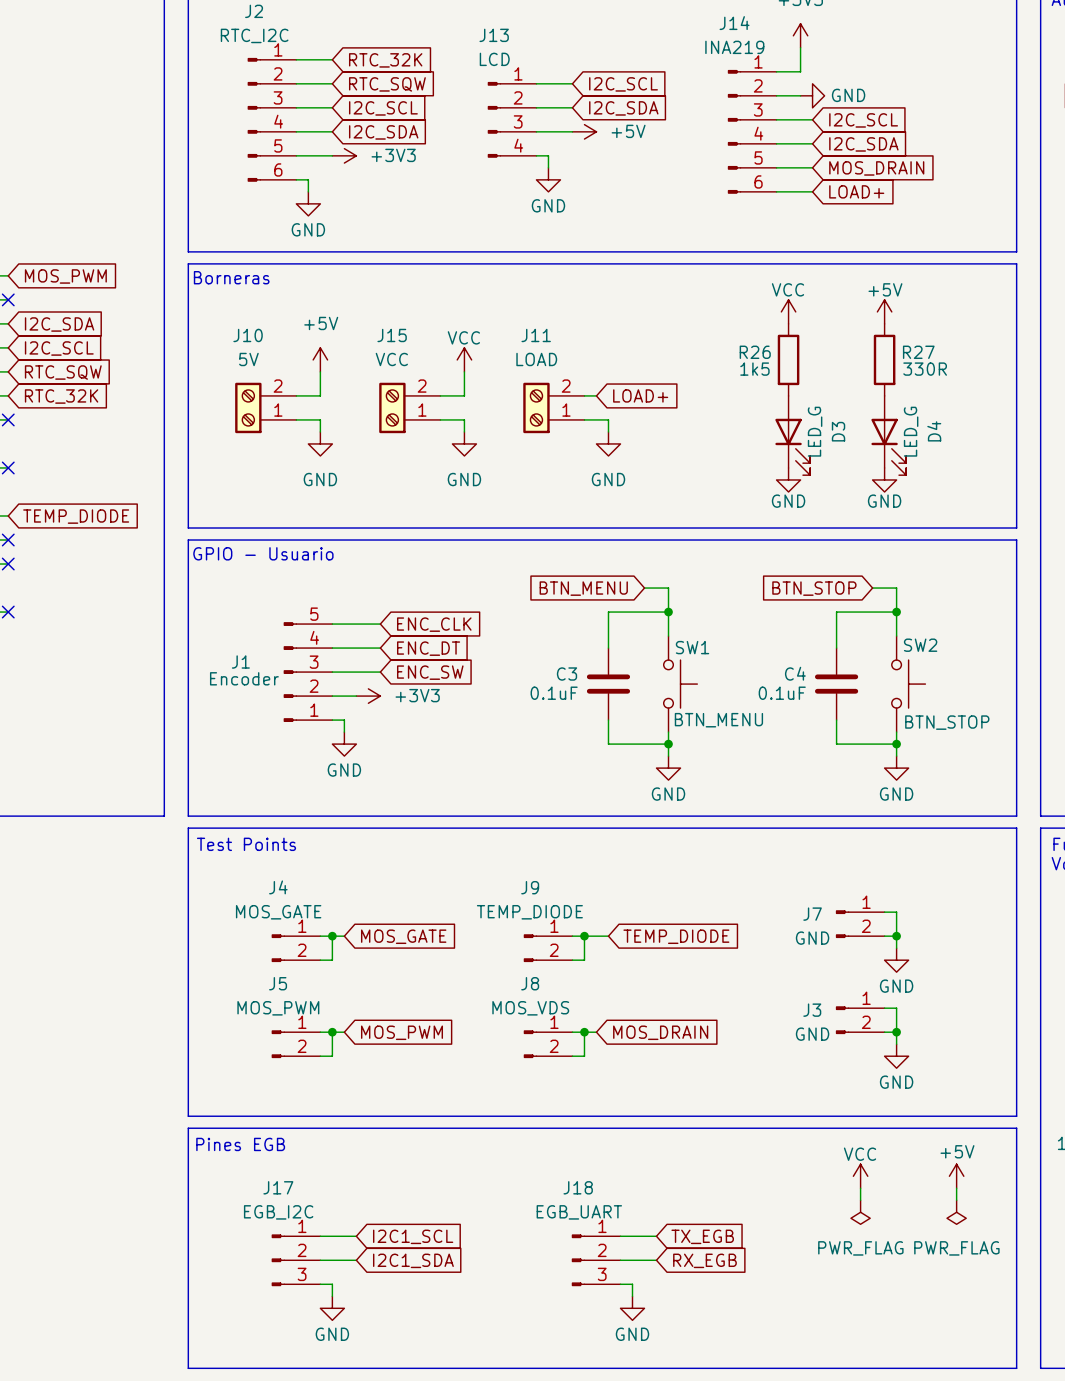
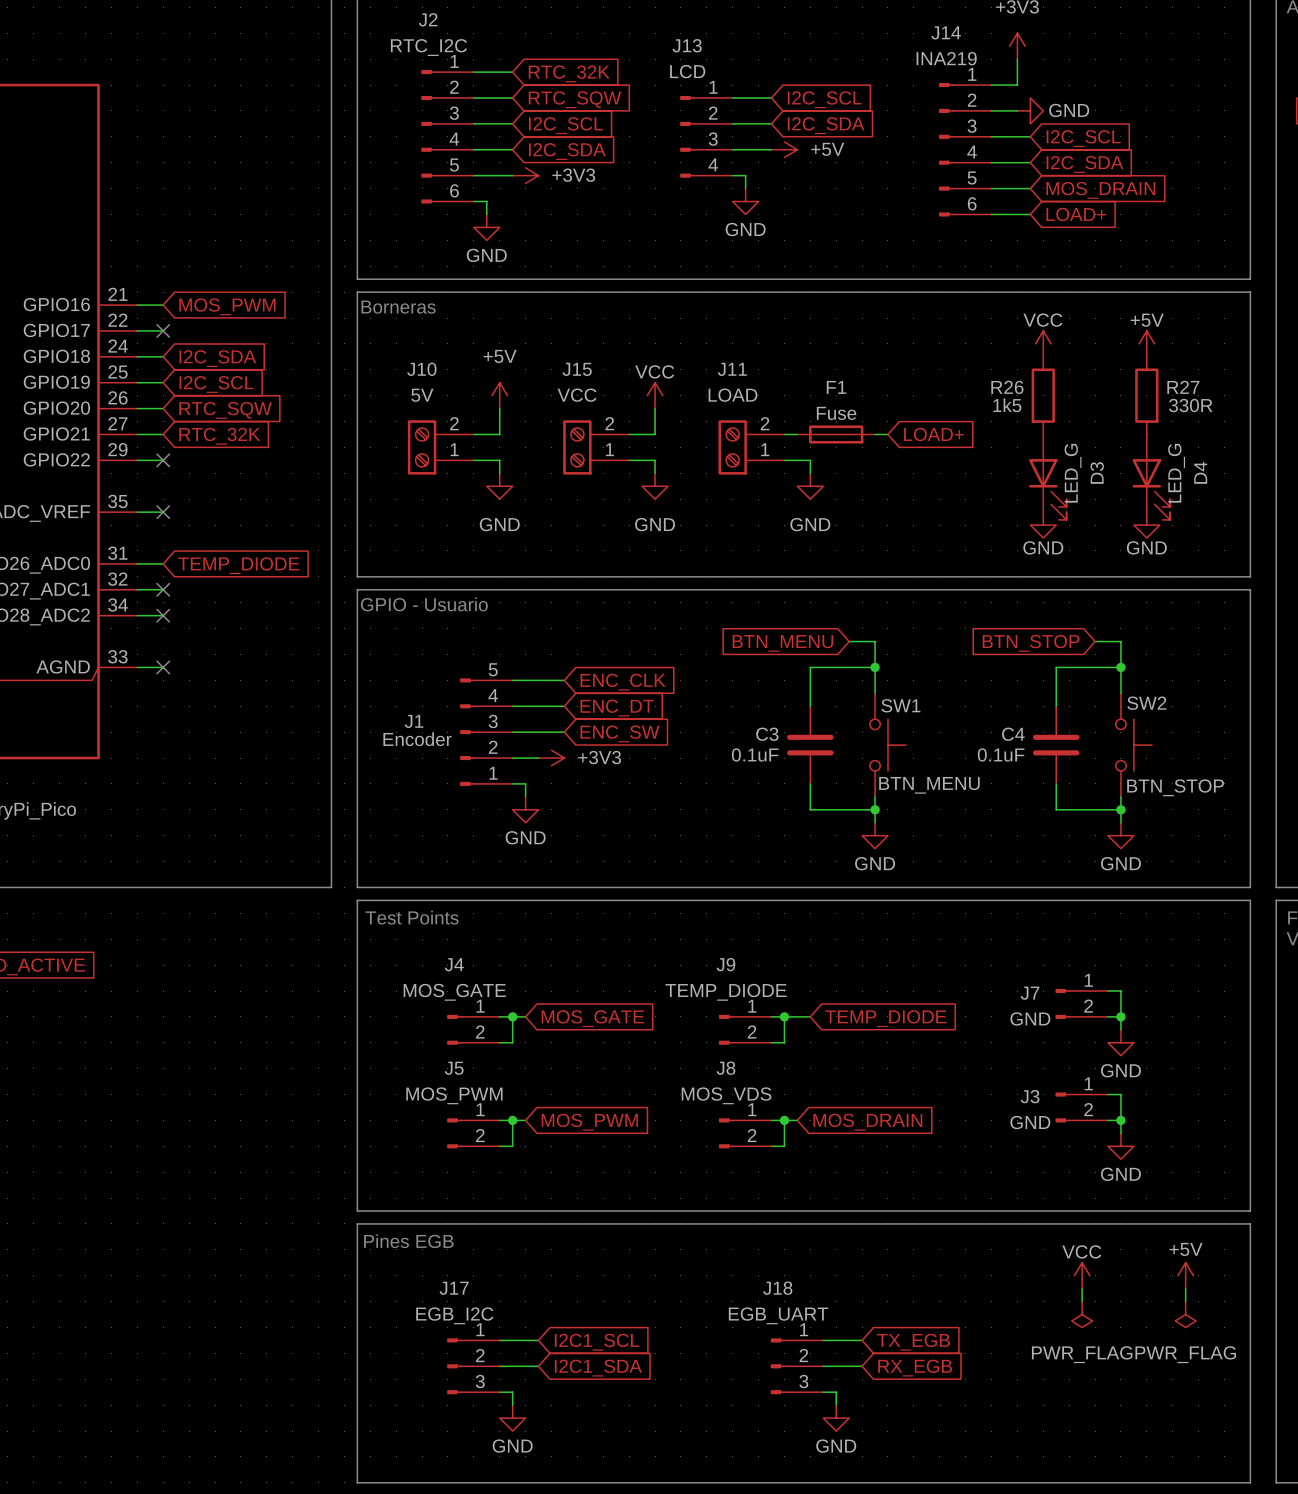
power symbol position: VCC (788, 311) -> VCC (1043, 343)
power symbol position: +5V (884, 311) -> +5V (1146, 343)
R26 position: (788, 359) -> (1043, 395)
R27 position: (884, 359) -> (1146, 395)
F1: none -> Fuse (836, 434)
global label position: LOAD+ (640, 395) -> LOAD+ (933, 434)
wire: none -> (875, 434) (887, 434)
D3 position: (792, 435) -> (1047, 477)
D4 position: (888, 435) -> (1151, 477)
power symbol: GND (788, 479) -> none
power symbol: none -> GND (1043, 525)
power symbol: GND (884, 479) -> none
power symbol: none -> GND (1146, 525)

